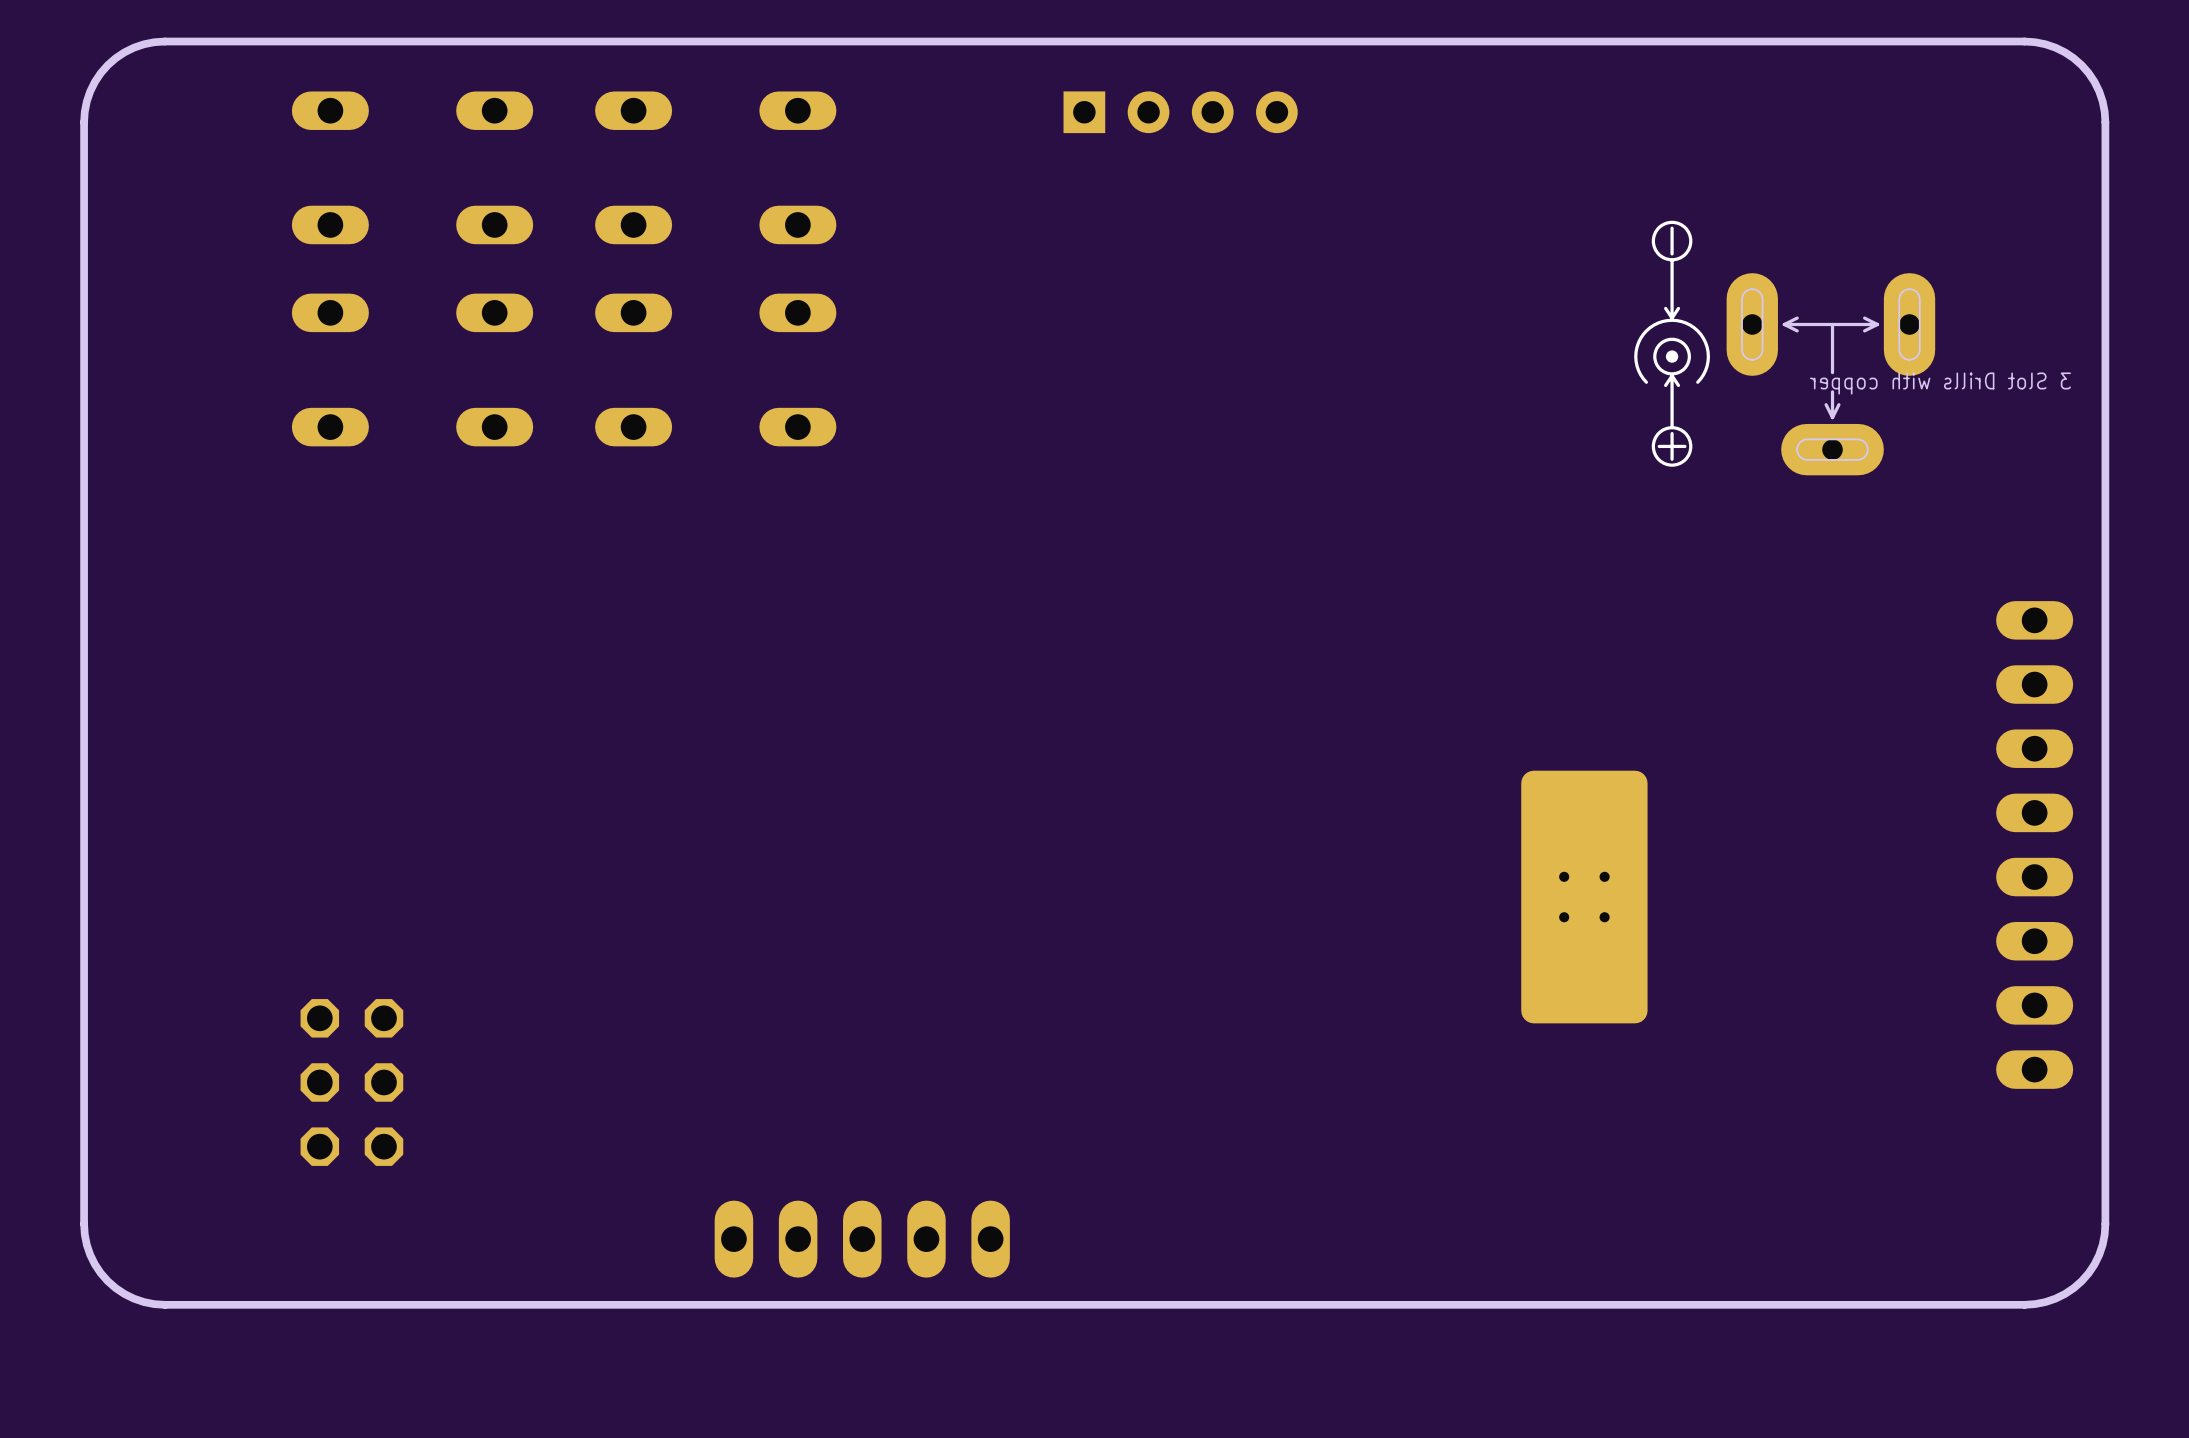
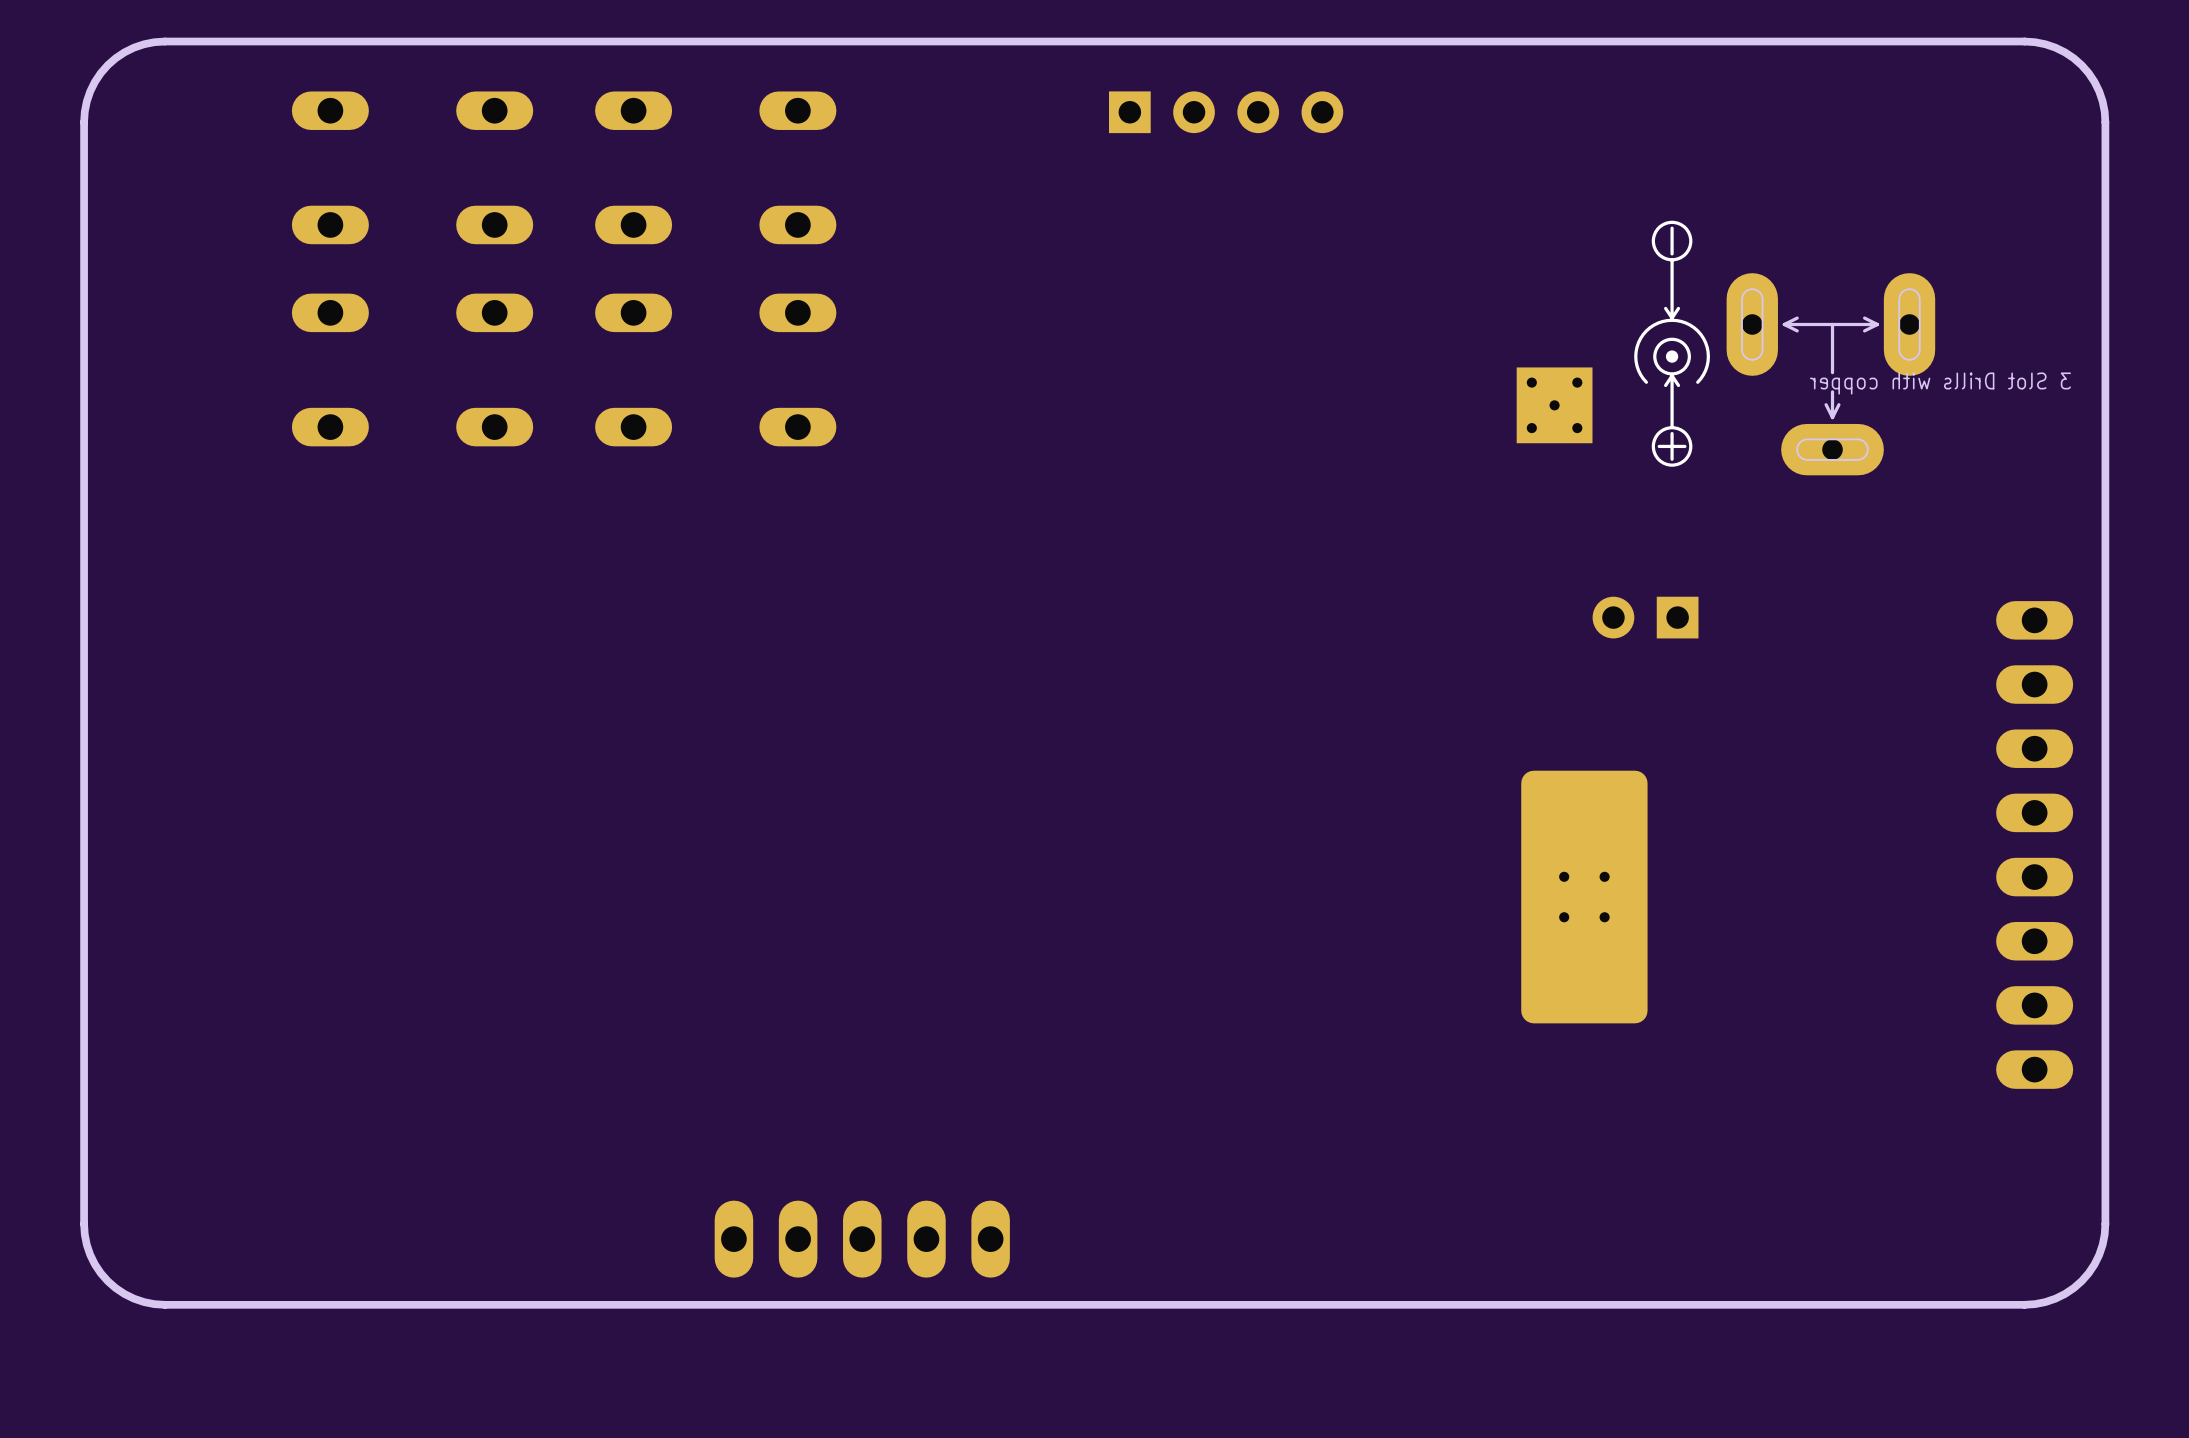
part position: (1180, 112) -> (1226, 112)
part: none -> (1554, 405)
part: none -> (1645, 617)
part: (351, 1082) -> none

